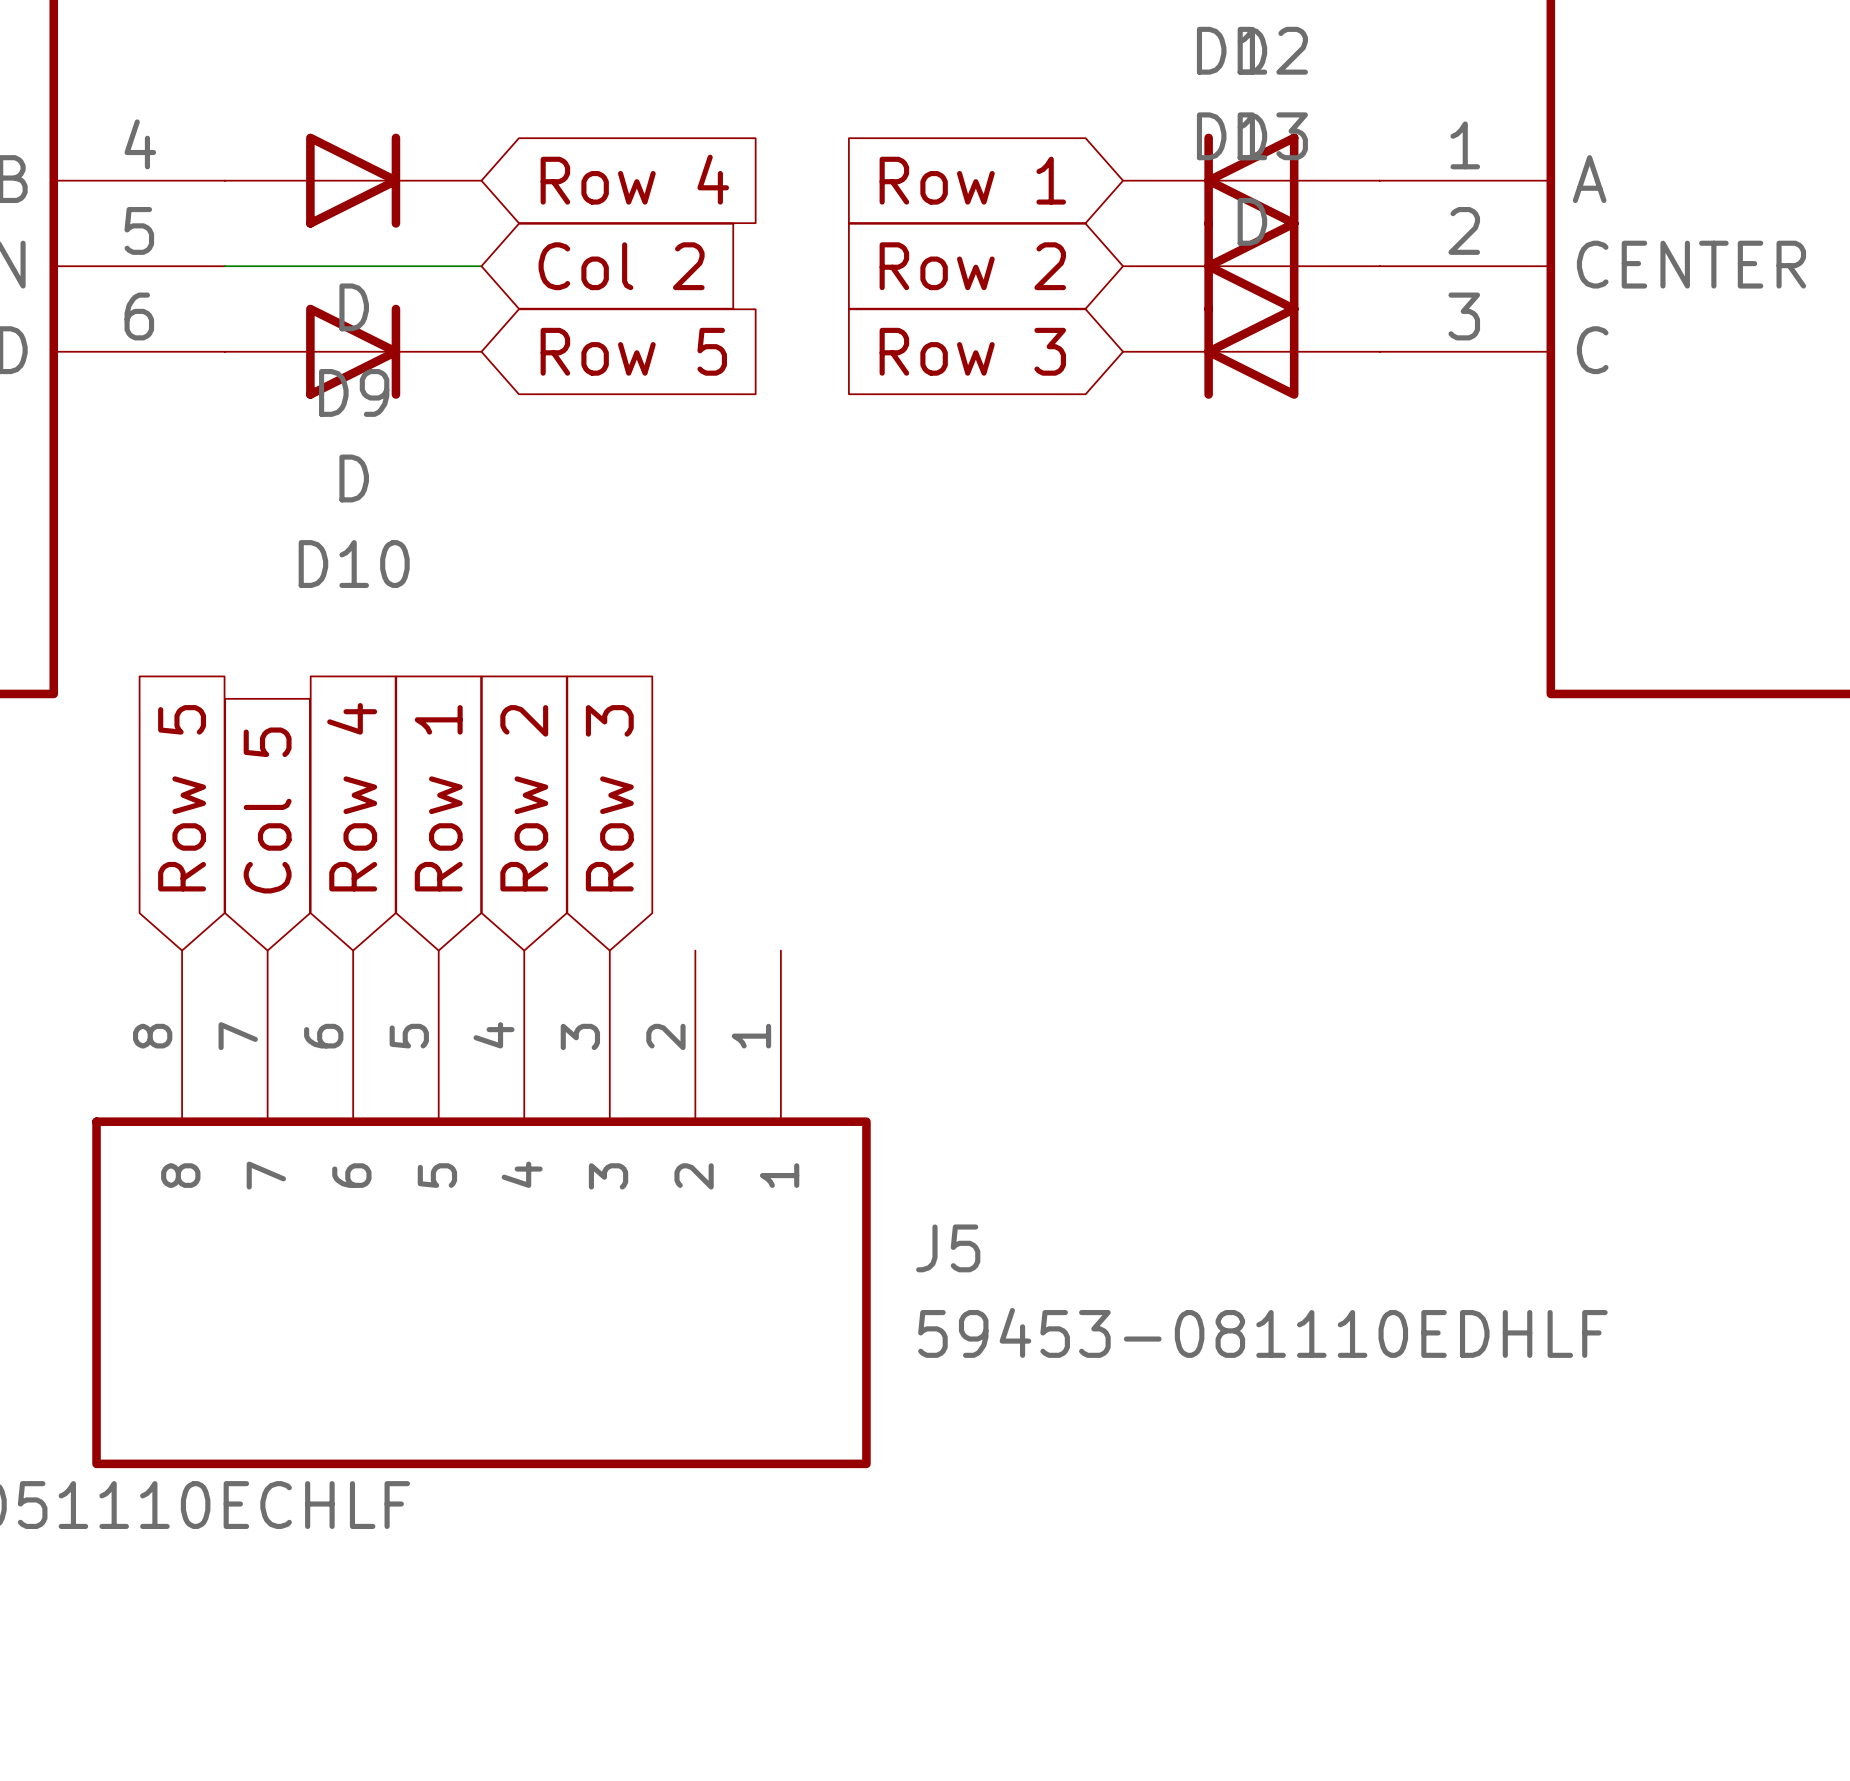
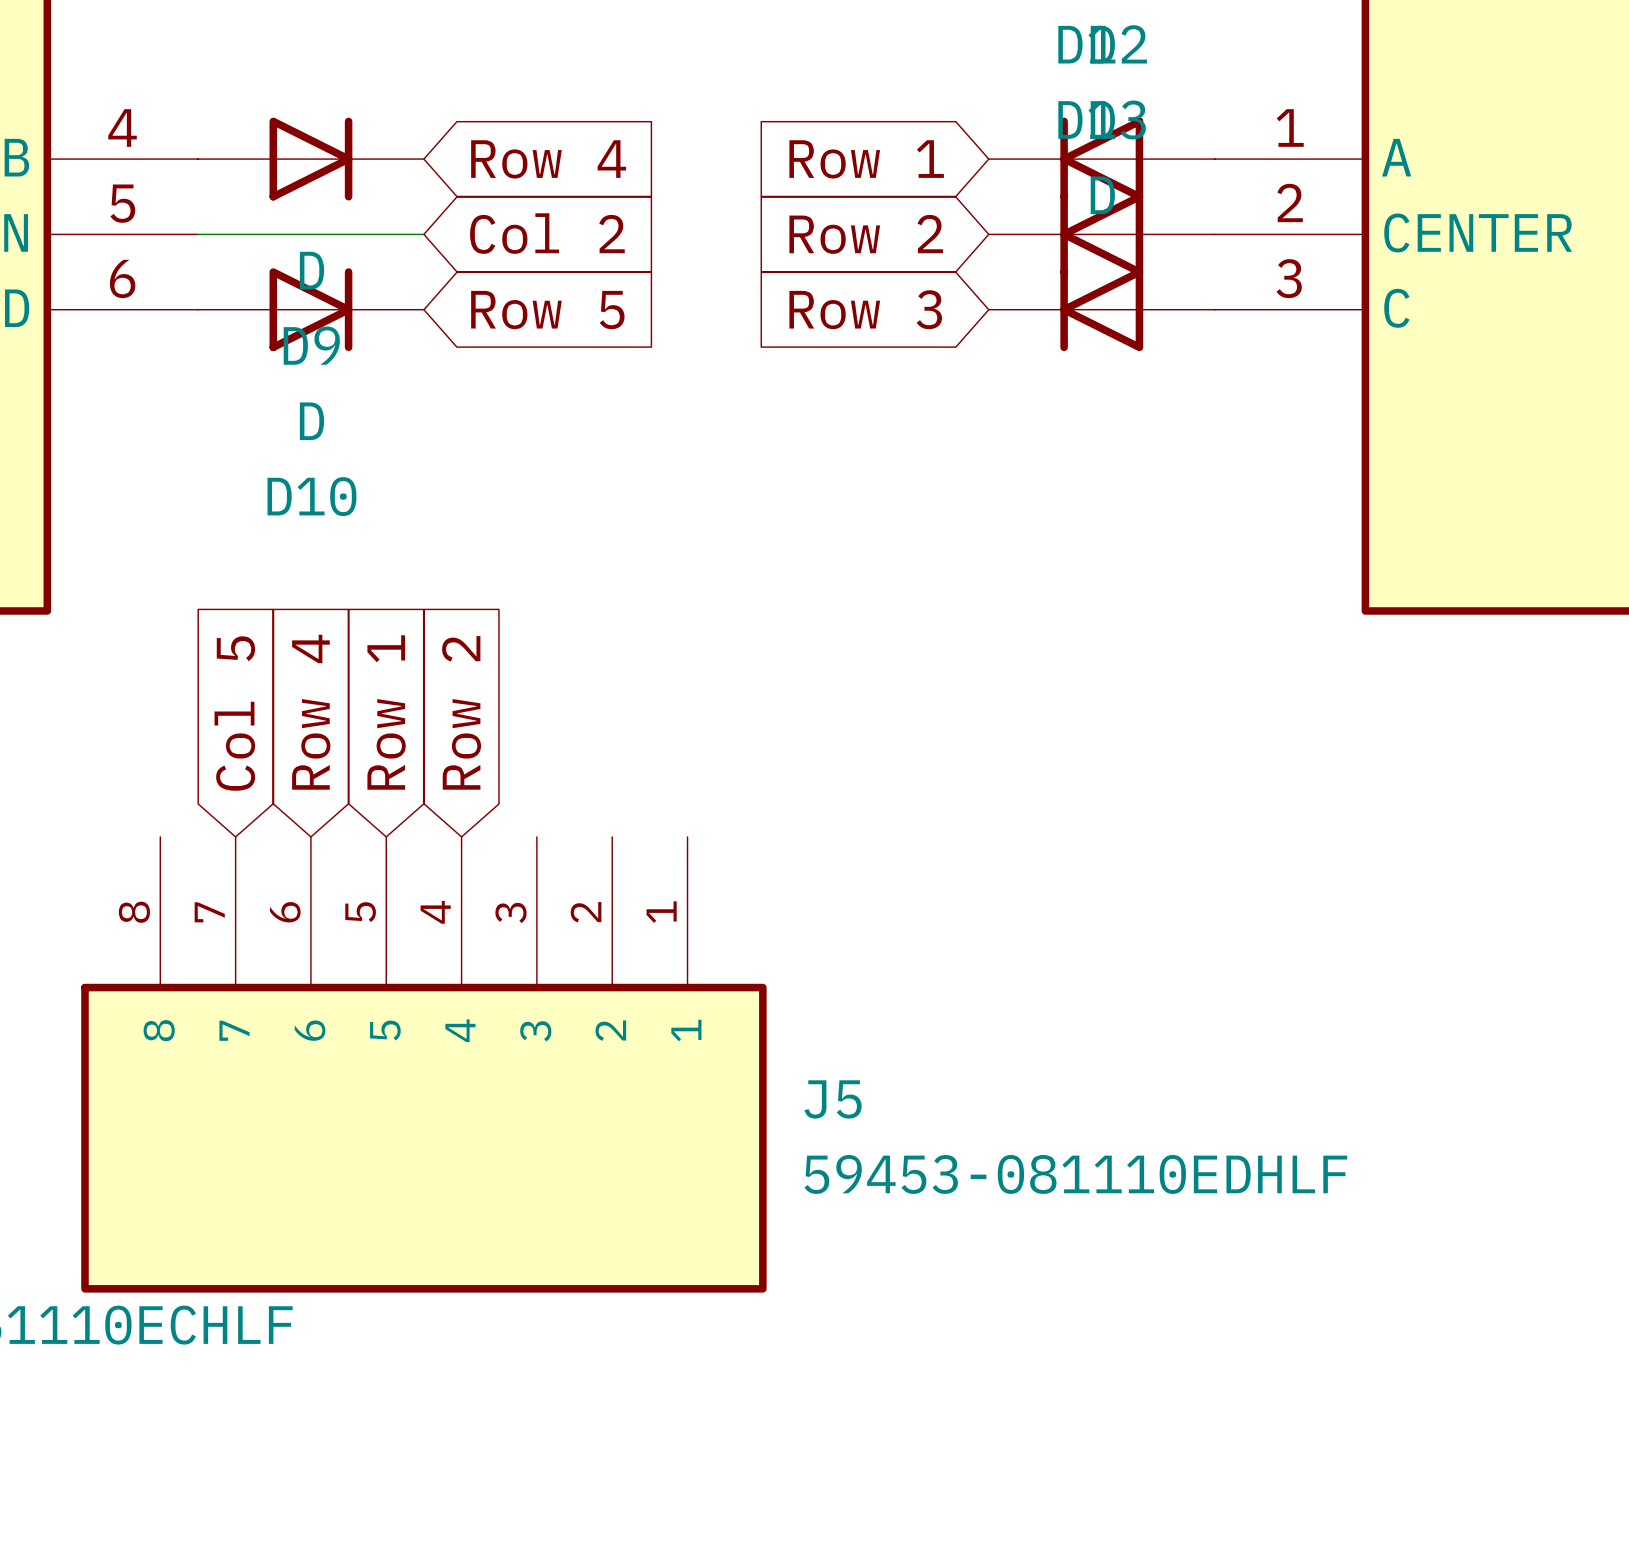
global label: Row 5 (182, 798) -> none
global label: Row 3 (609, 798) -> none

